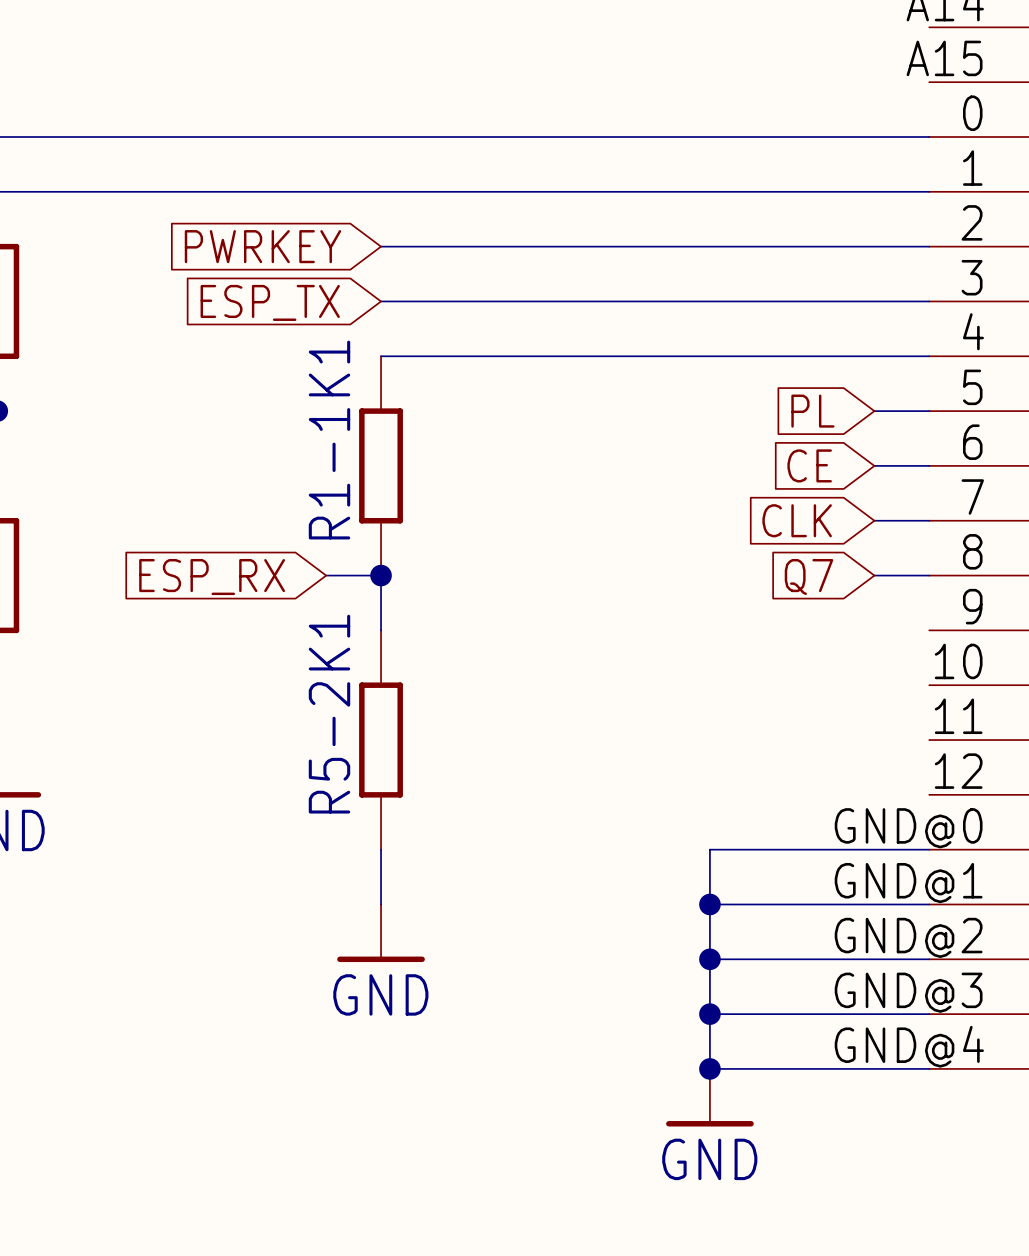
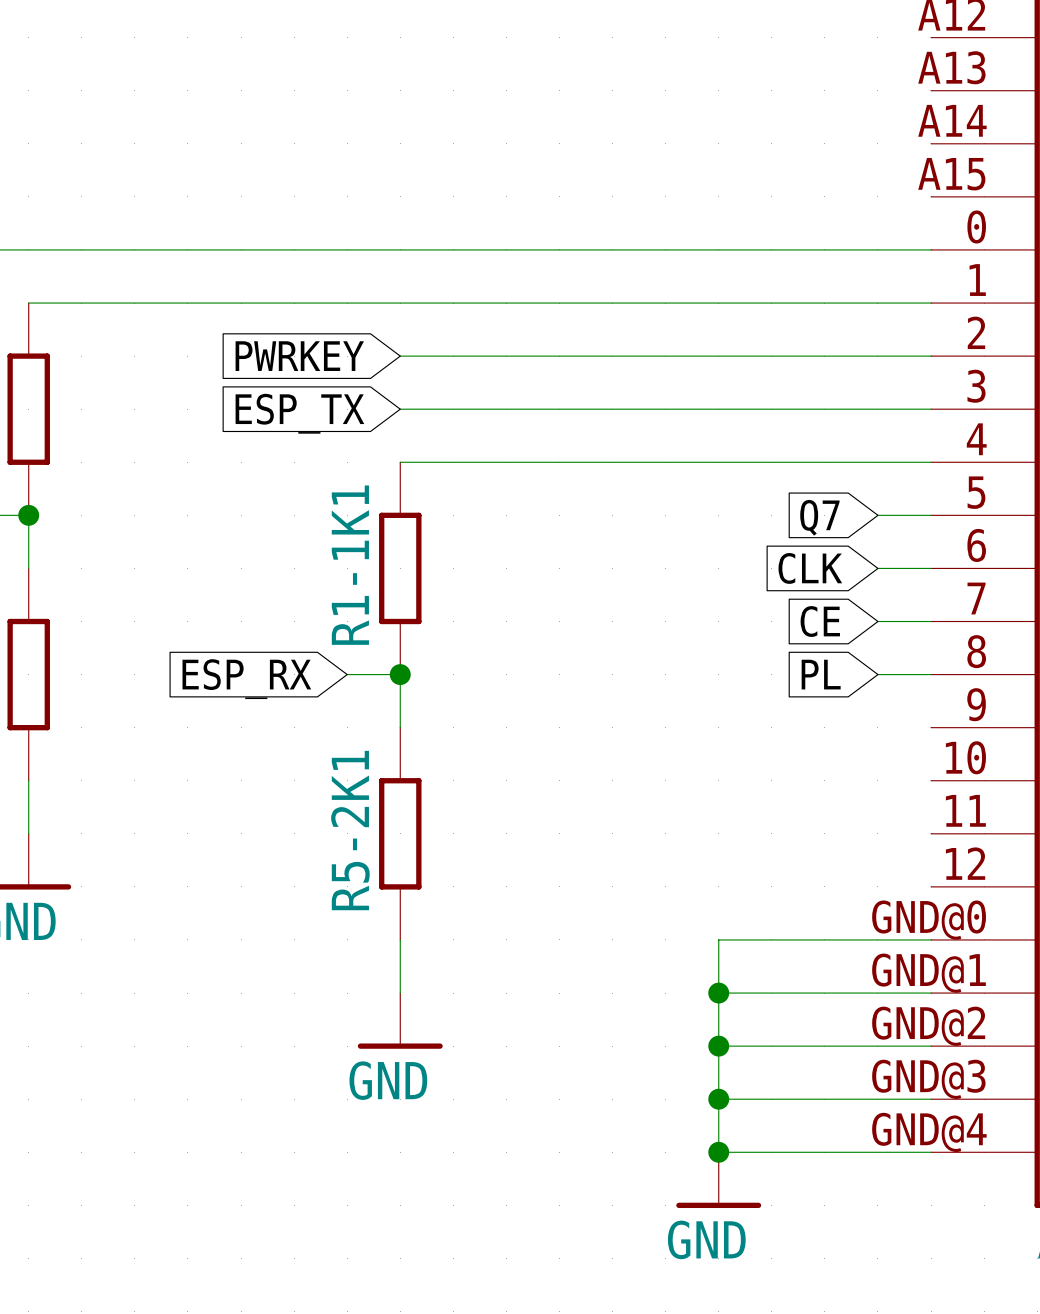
global label: PL (812, 411) -> Q7 (819, 517)
global label: CE (809, 465) -> CLK (810, 568)
global label: CLK (797, 520) -> CE (820, 621)
global label: Q7 (808, 577) -> PL (821, 674)

